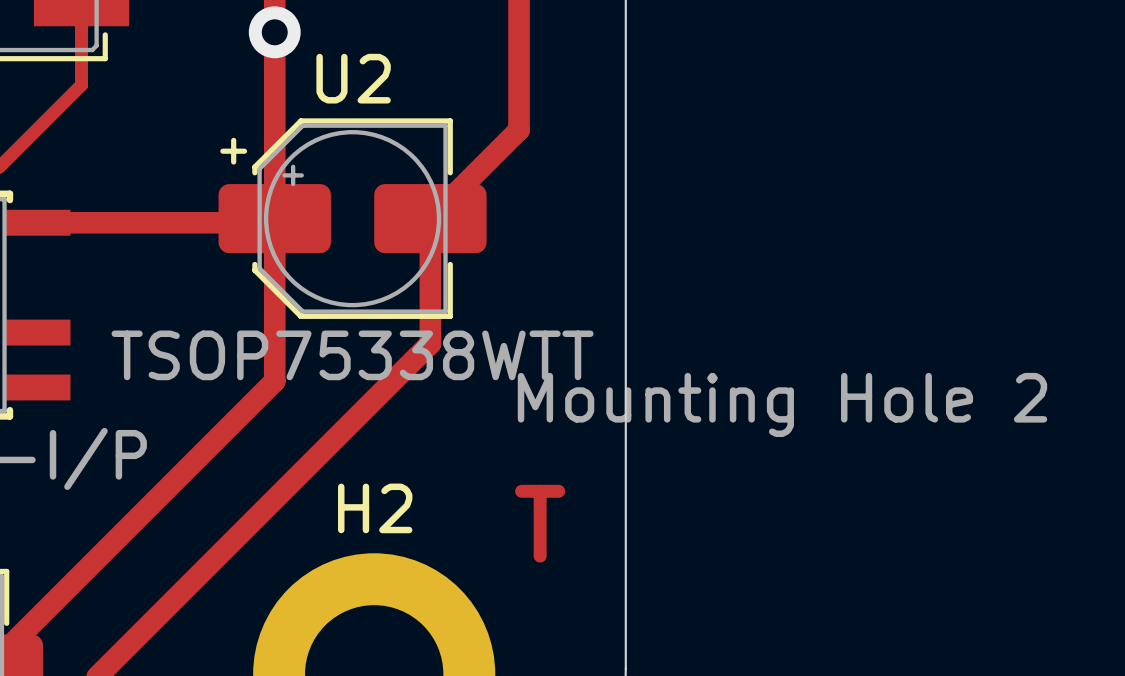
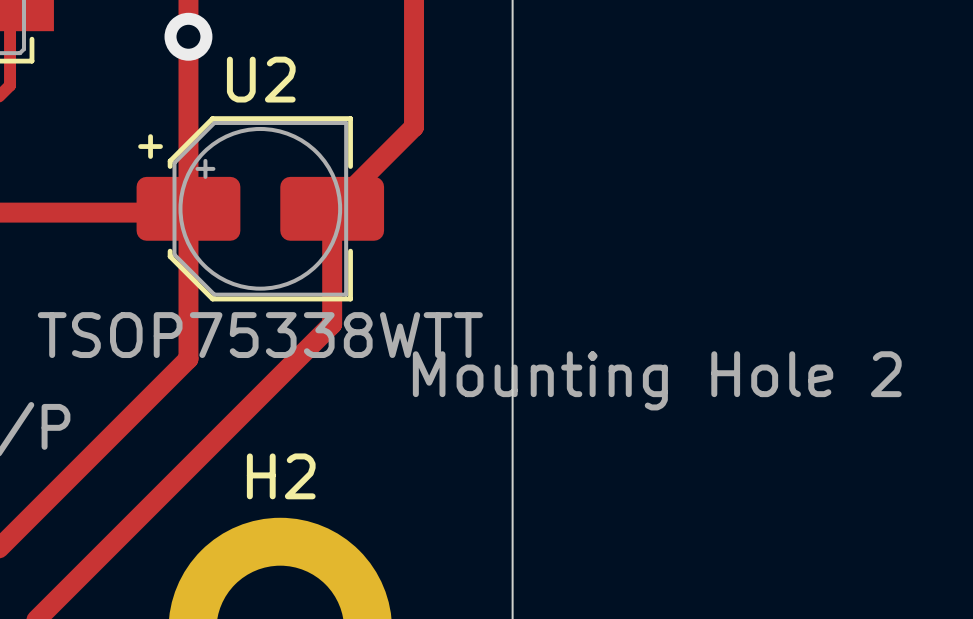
text: T (540, 523) -> none

